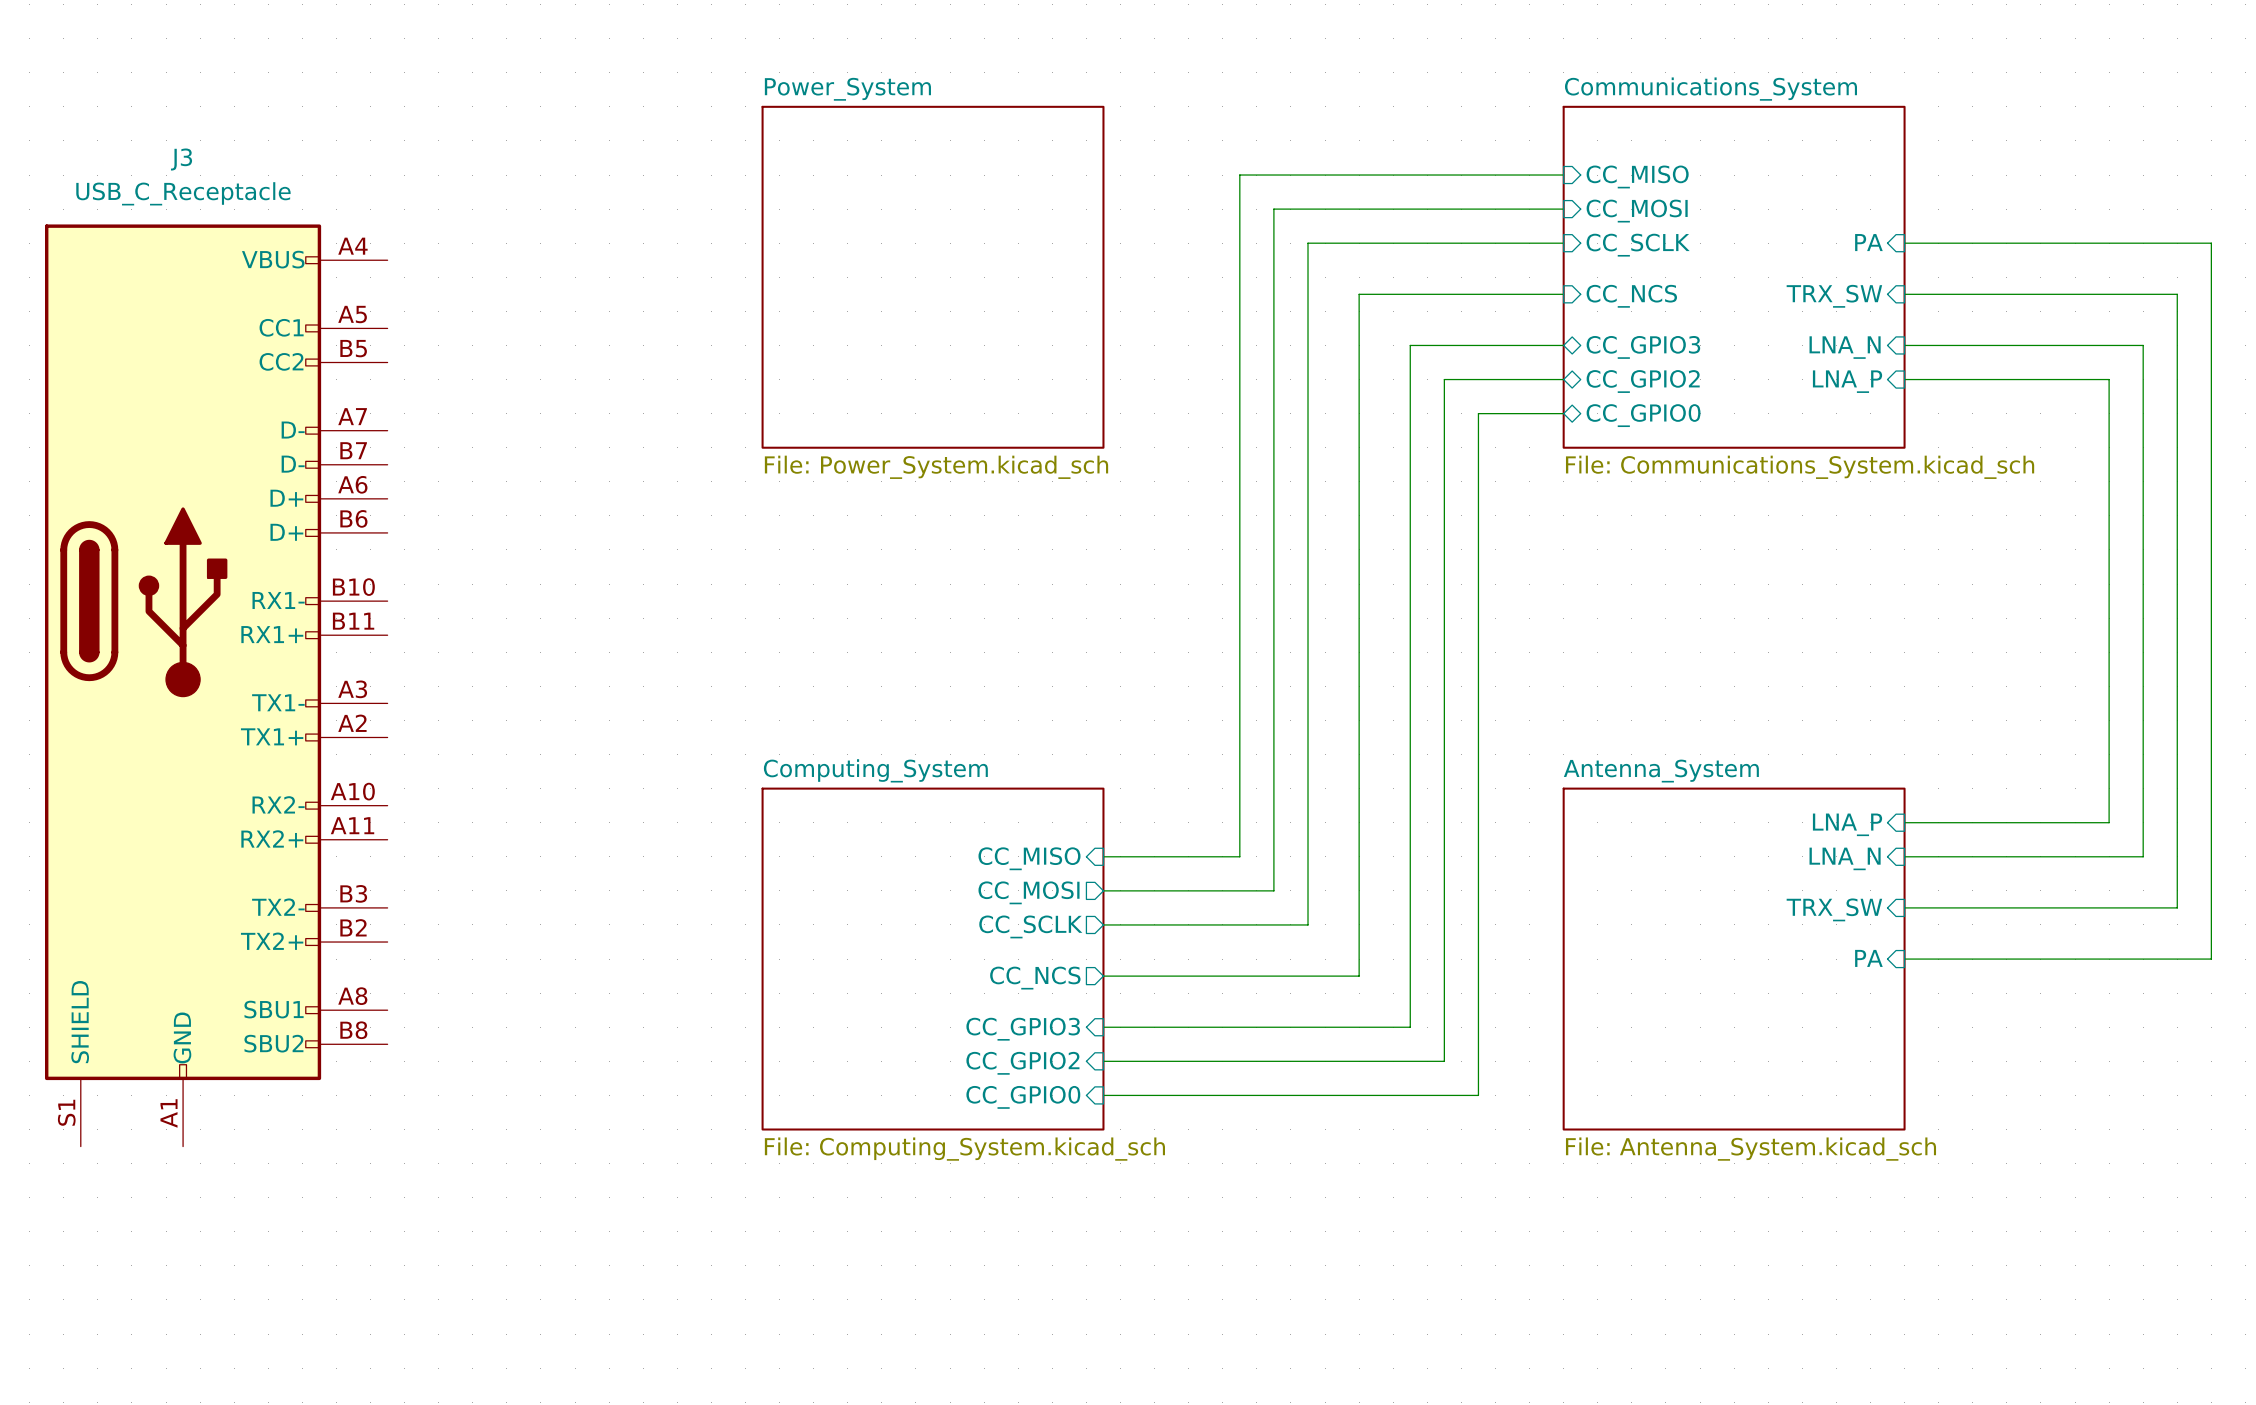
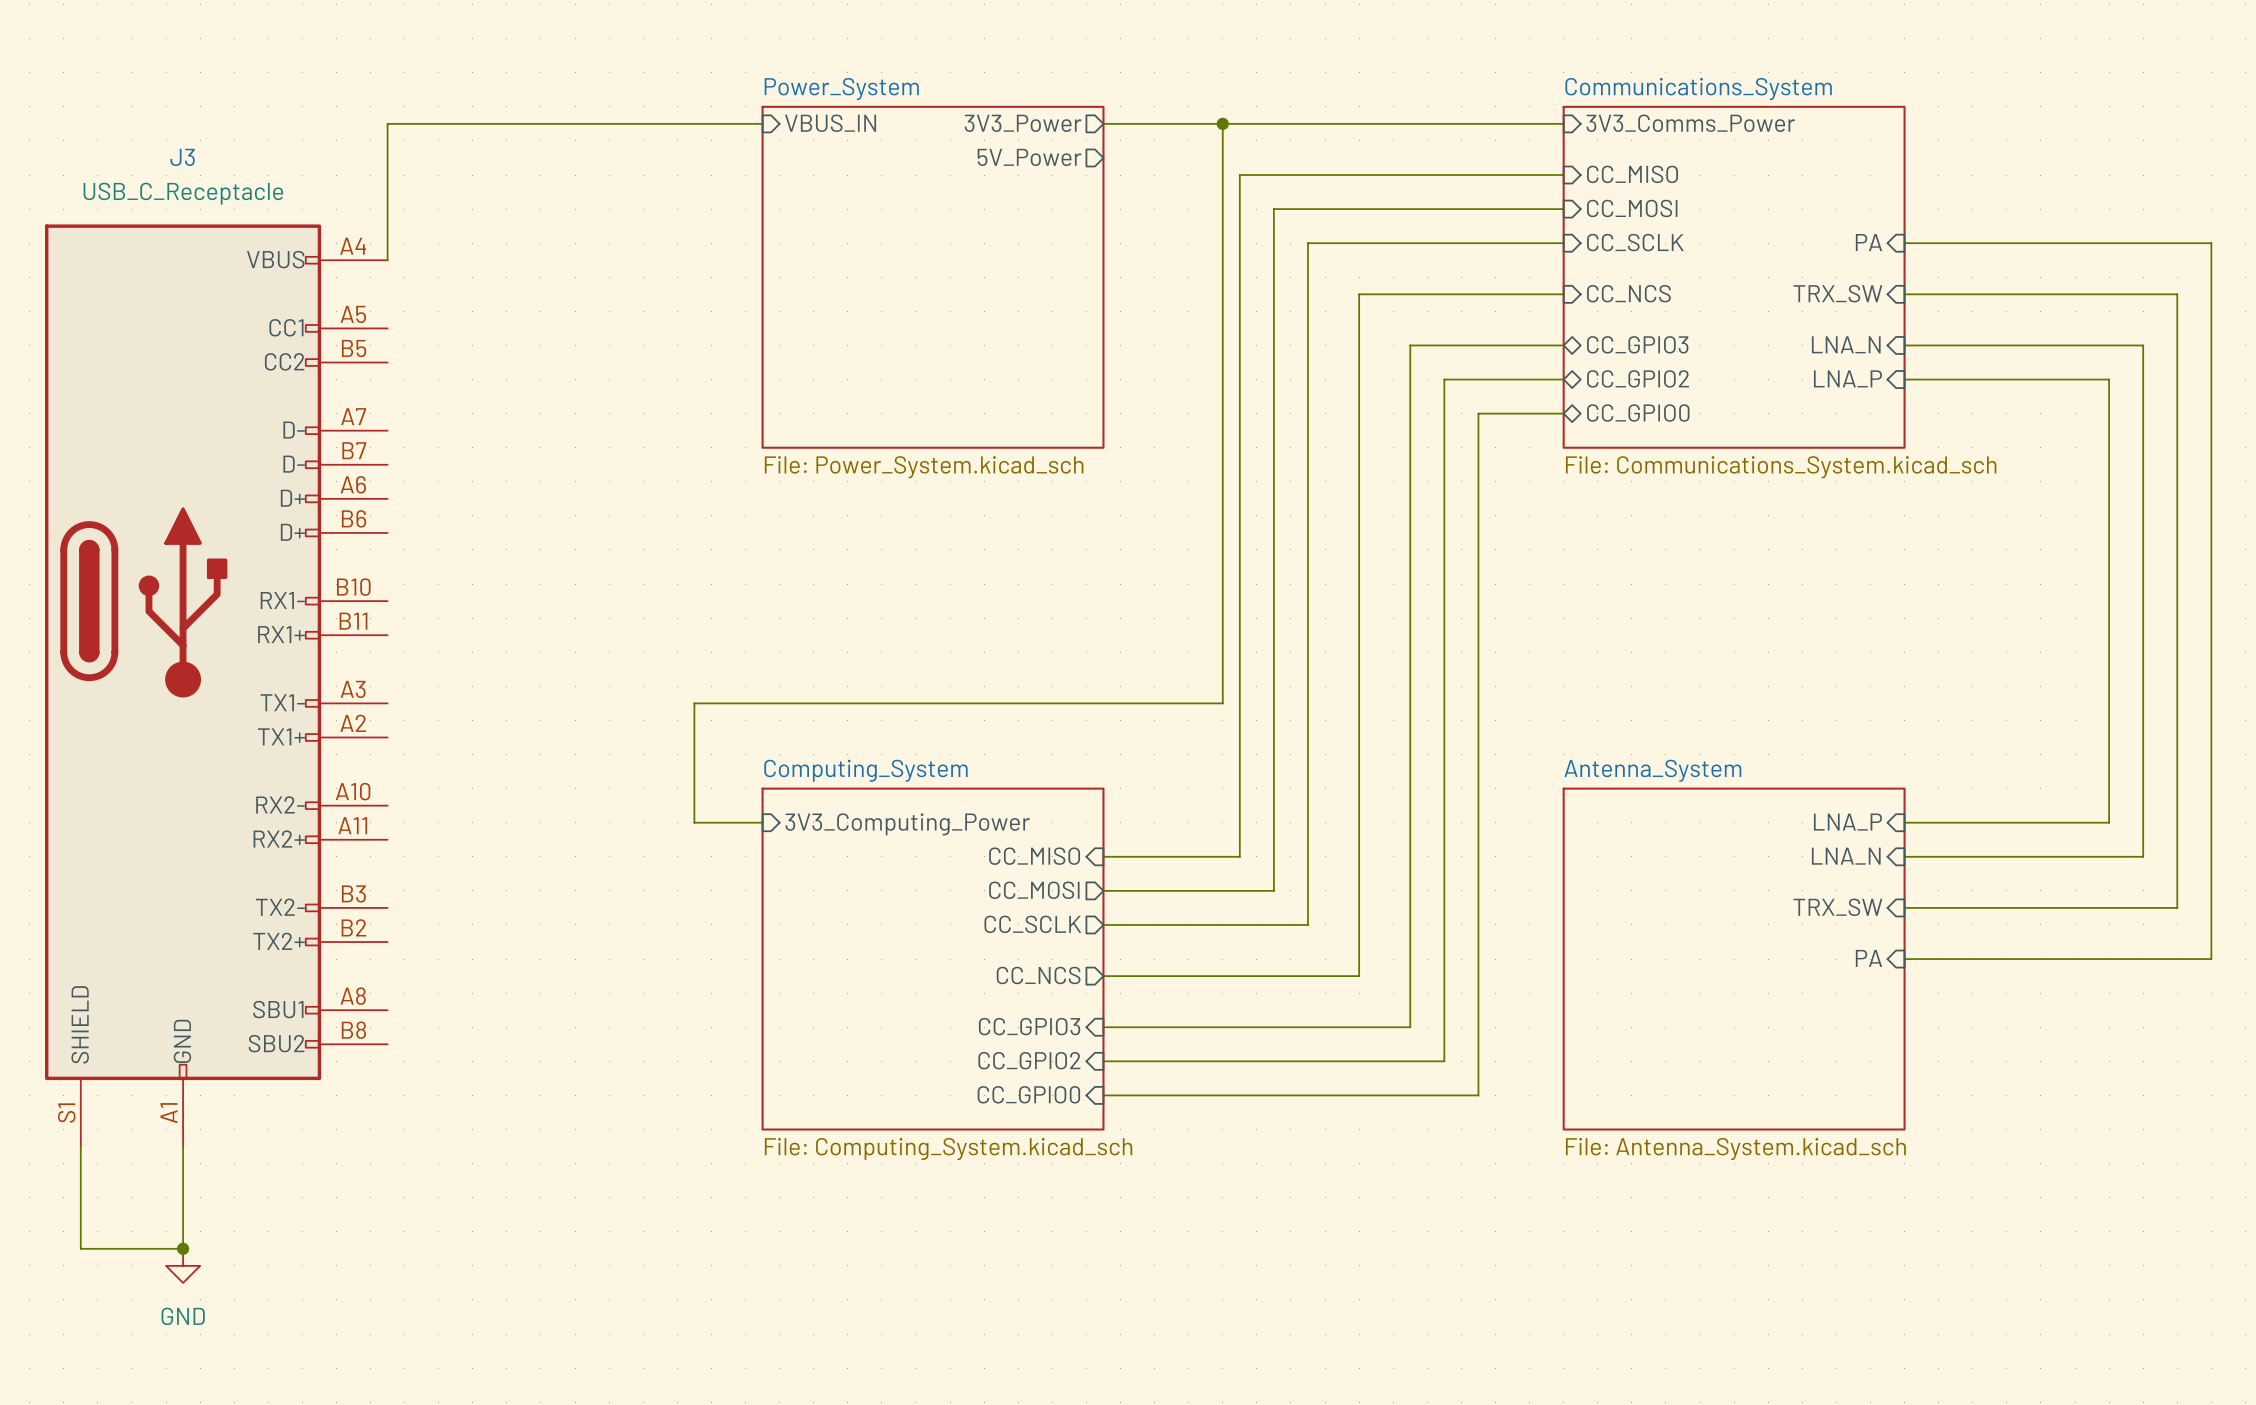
wire: none -> (762, 123) (387, 123) (387, 260)
wire: none -> (1103, 123) (1563, 123)
wire: none -> (1222, 123) (1222, 703) (694, 703) (694, 822) (762, 822)
junction: none -> (1222, 123)
sheet pin: none -> VBUS_IN (830, 123)
sheet pin: none -> 3V3_Power (1023, 123)
sheet pin: none -> 3V3_Comms_Power (1690, 123)
sheet pin: none -> 5V_Power (1029, 157)
sheet pin: none -> 3V3_Computing_Power (907, 824)
wire: none -> (80, 1146) (80, 1248) (183, 1248) (183, 1146)
junction: none -> (183, 1248)
power symbol: none -> GND (183, 1265)

